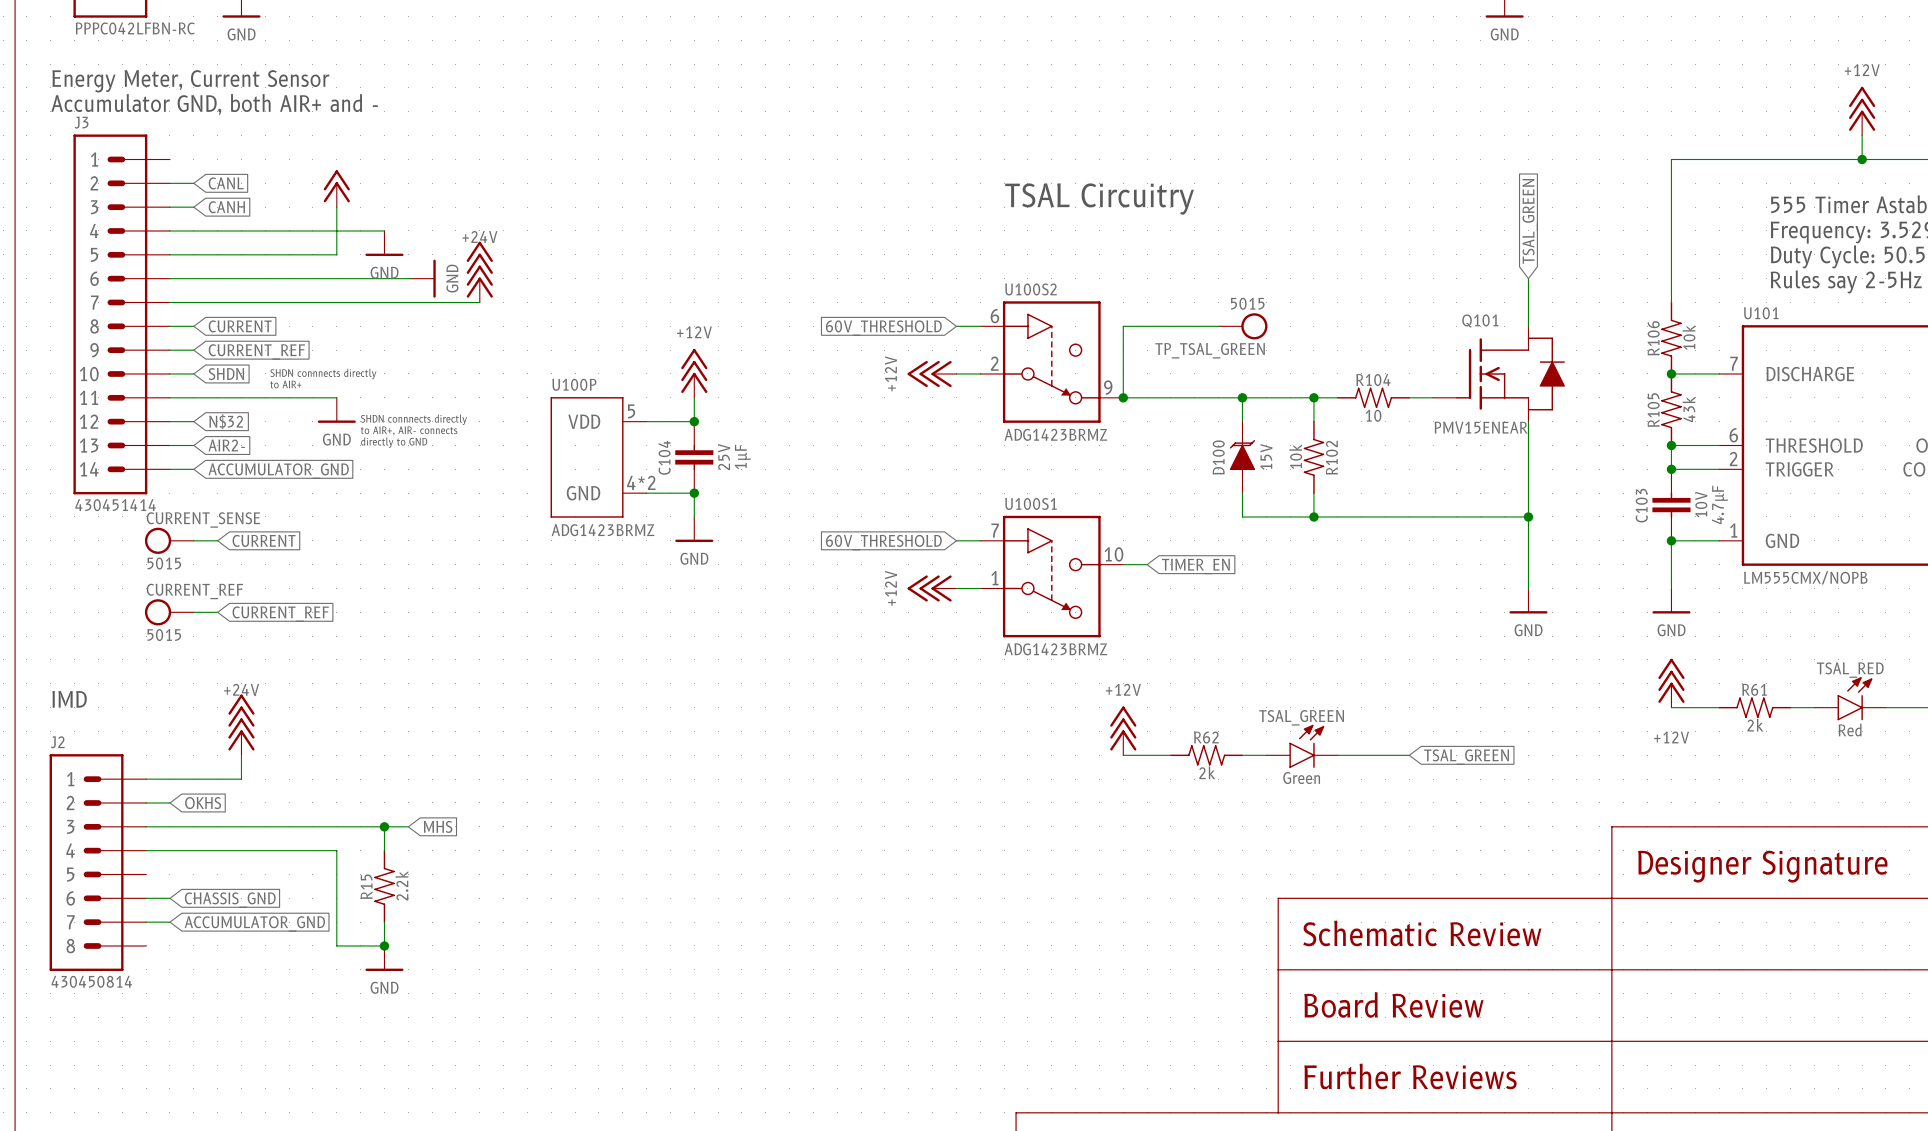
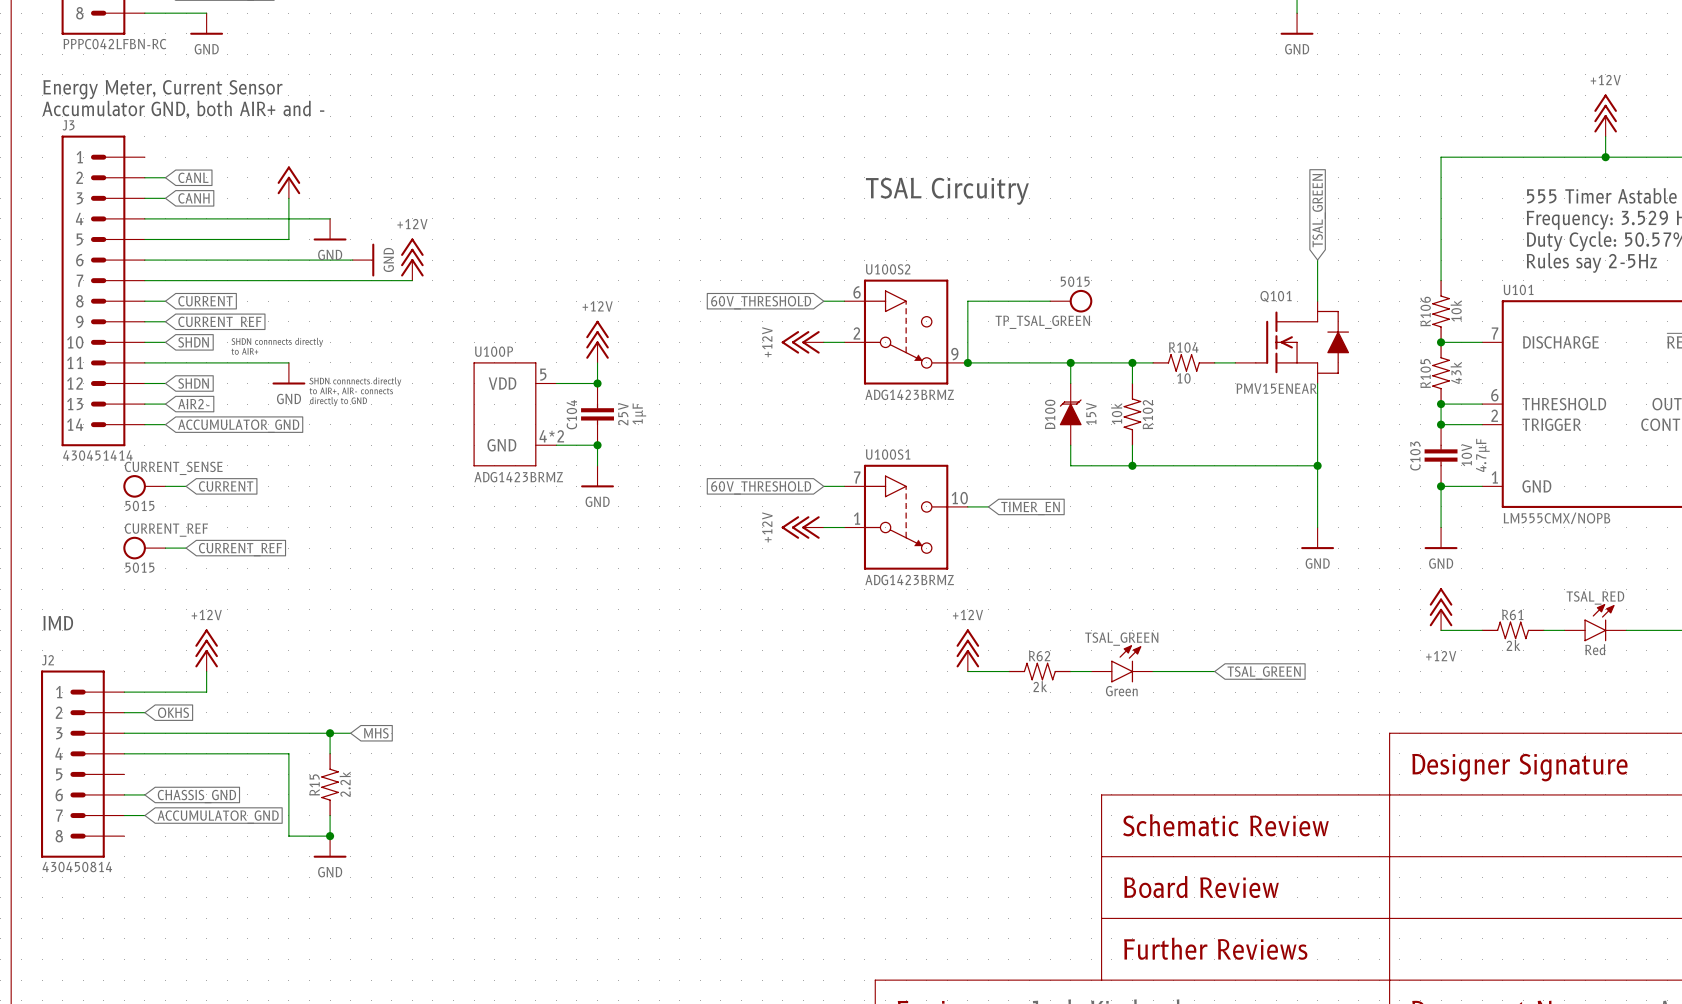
power symbol: +24V (479, 272) -> +12V (412, 259)
global label: N$32 (226, 421) -> SHDN (193, 383)
power symbol: +24V (241, 724) -> +12V (206, 650)

